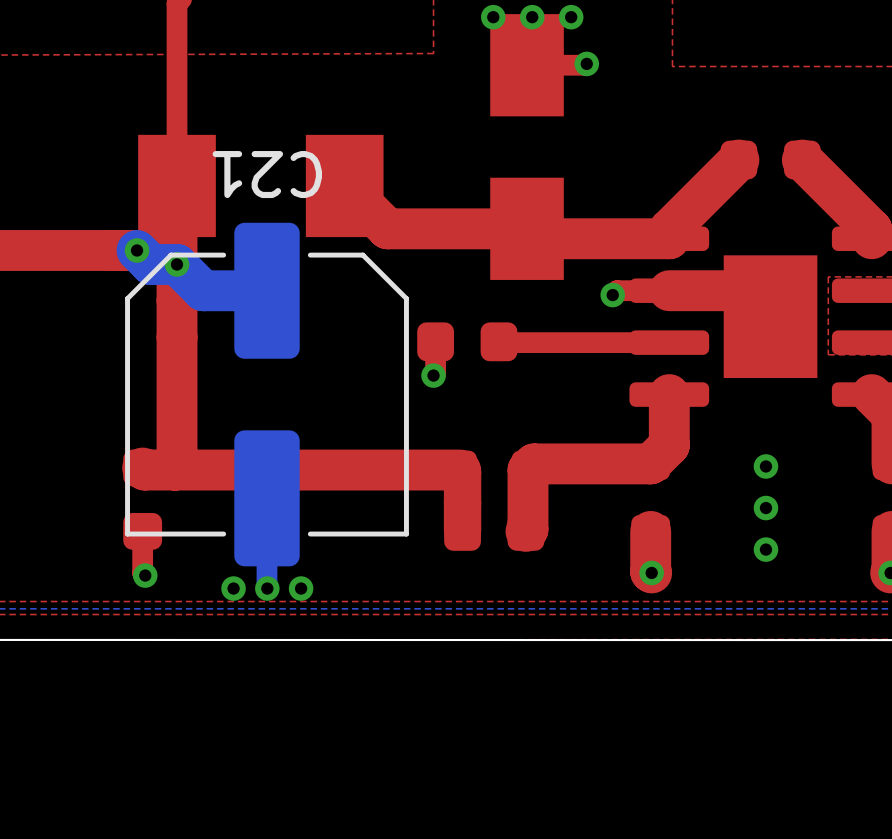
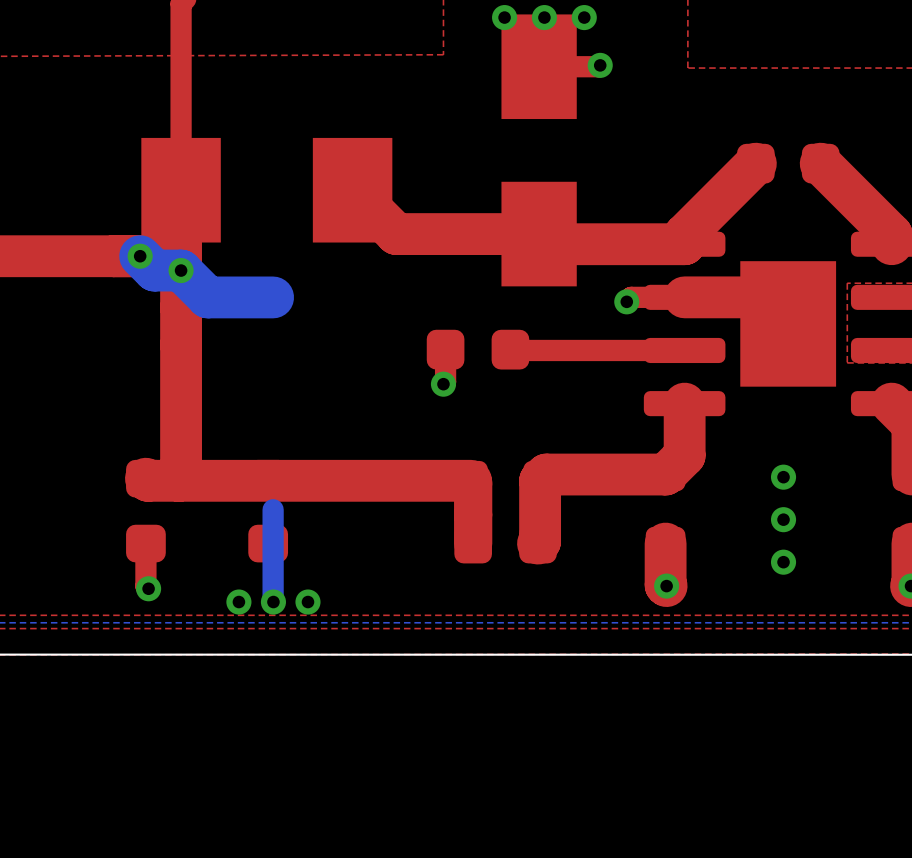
C21: (266, 394) -> none

